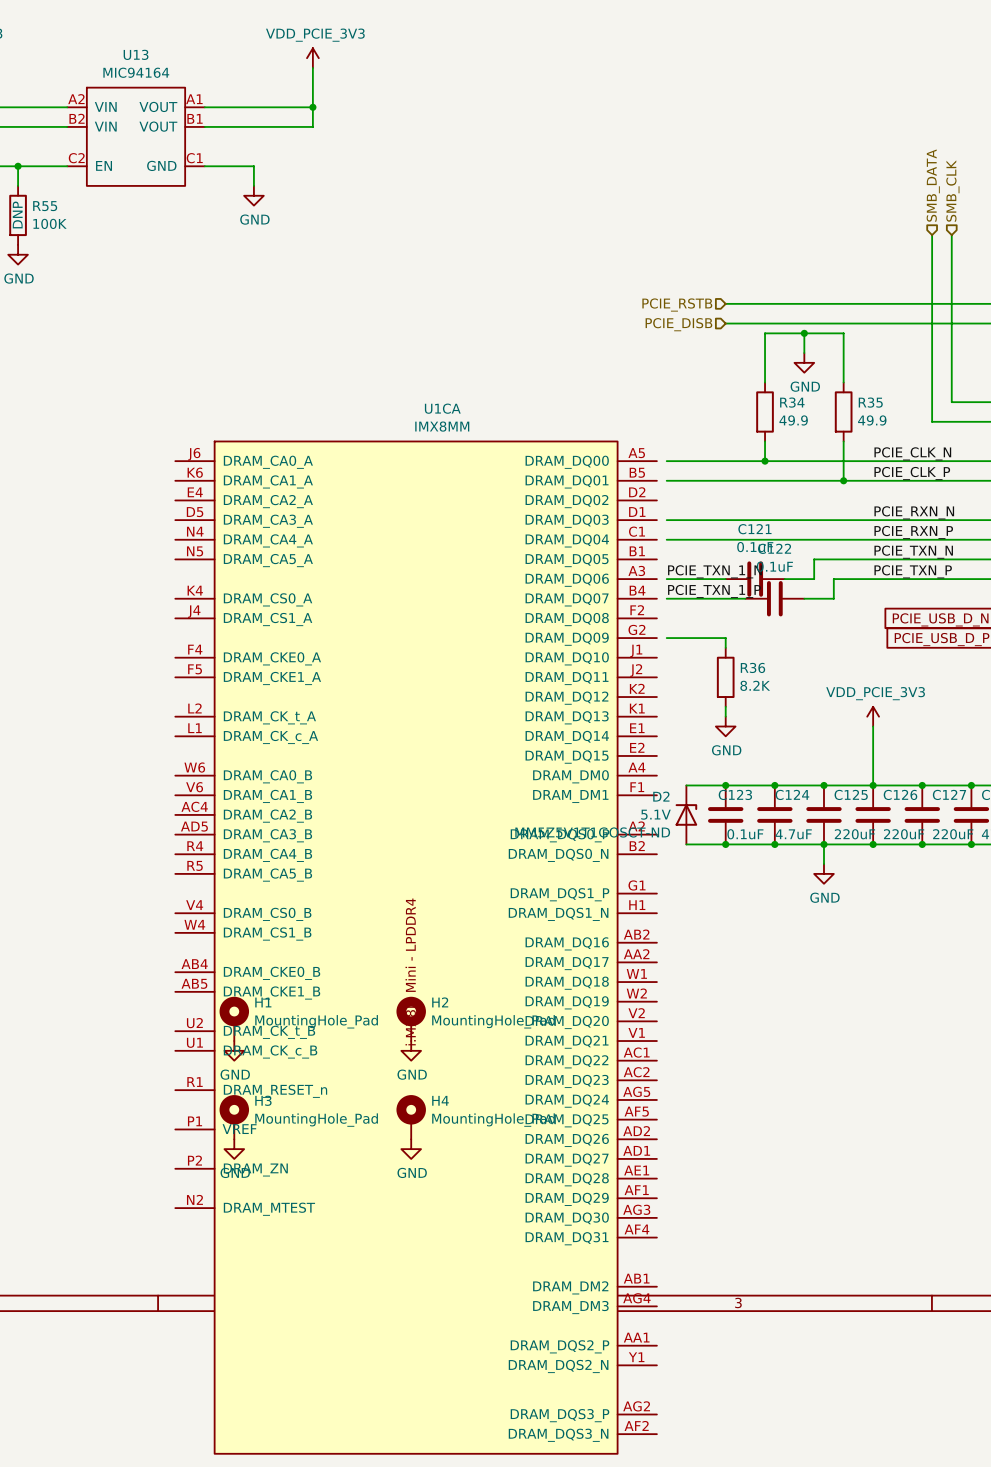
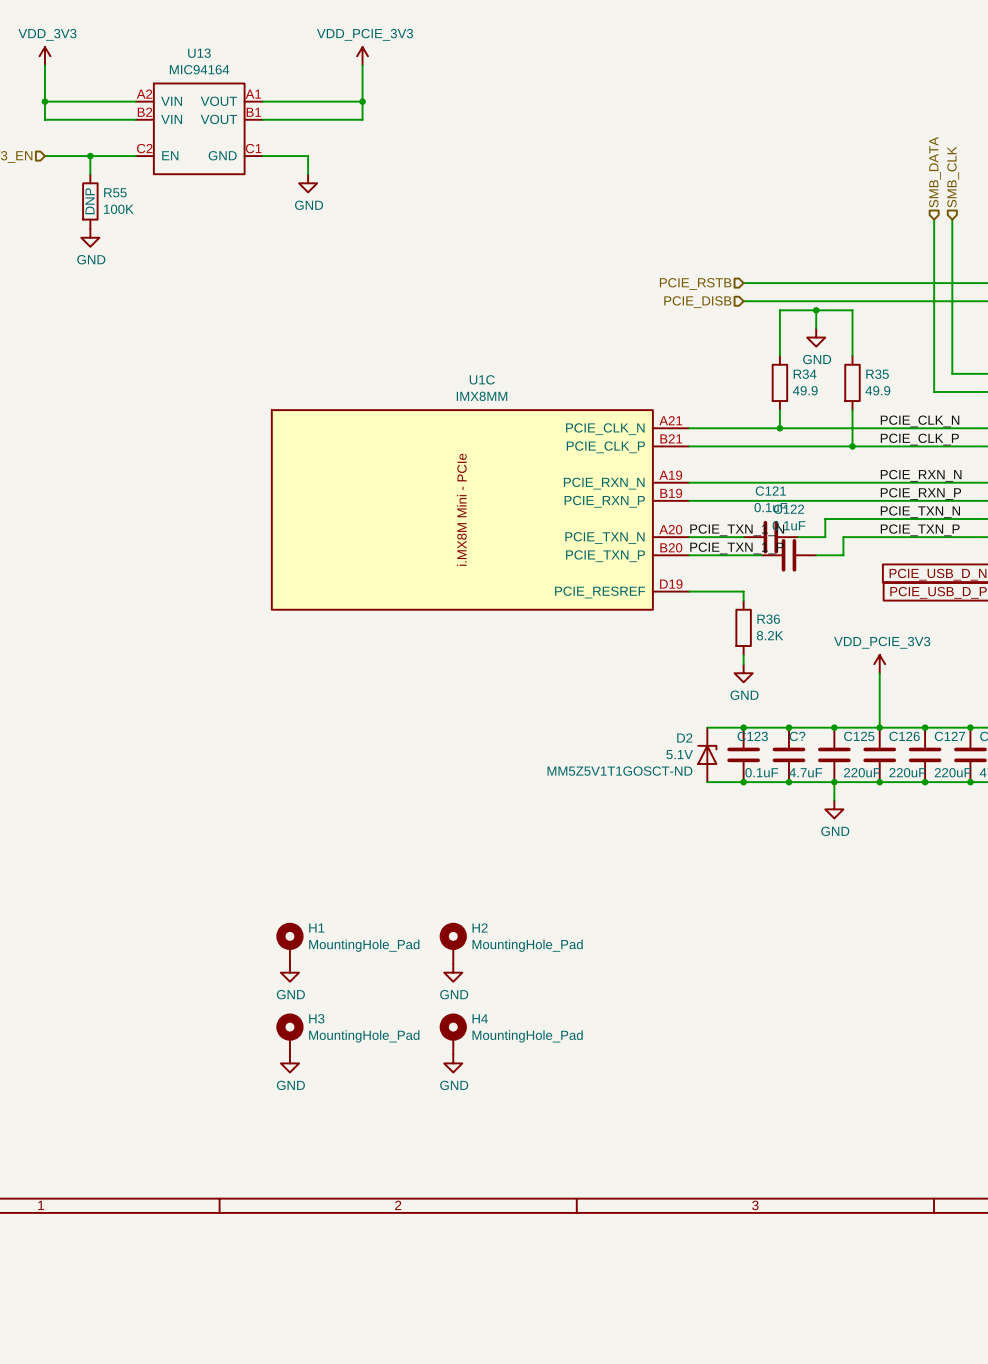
U1C: none -> IMX8MM (480, 509)
C124 name: C124 (792, 794) -> C? (797, 736)
U1CA: IMX8MM (416, 947) -> none

